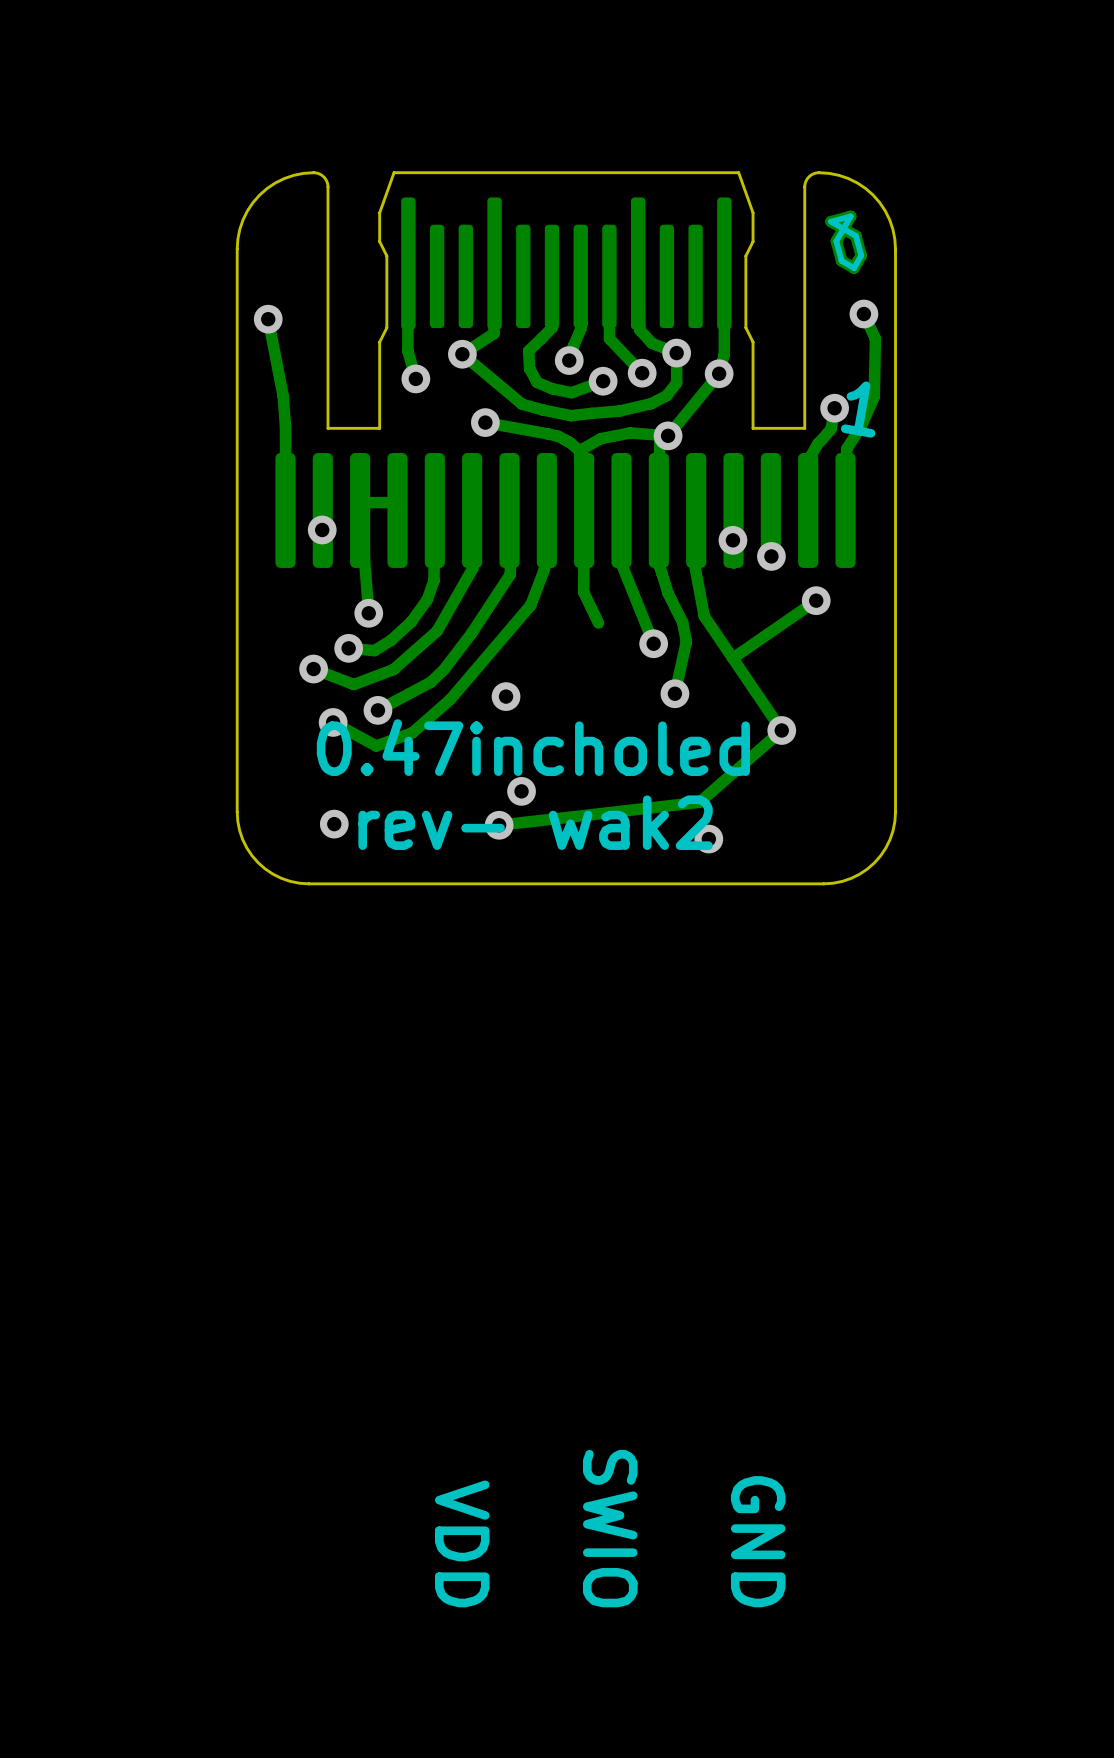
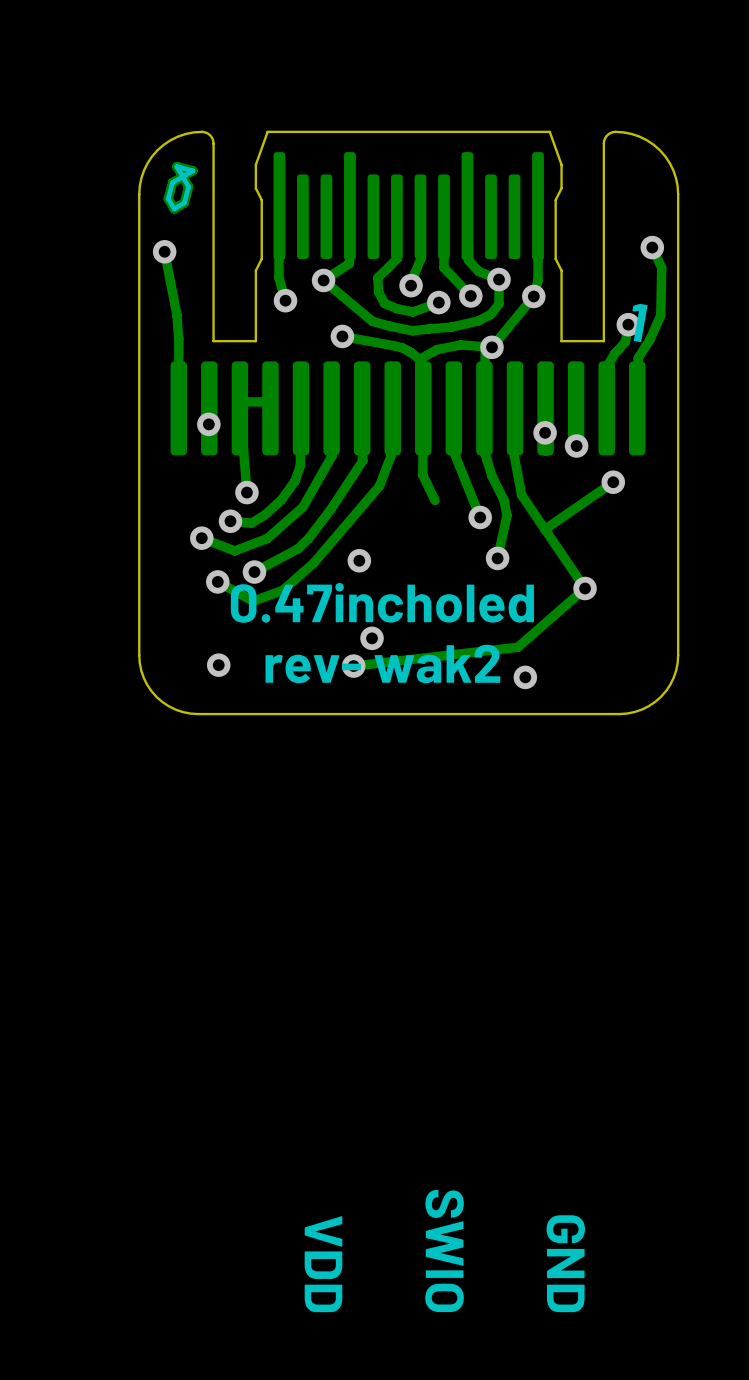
line: none -> (176, 166) (188, 186) (184, 202) (174, 208) (168, 198) (172, 182) (192, 170) (176, 166)
track: none -> (176, 166) (188, 186) (184, 202) (174, 208) (168, 198) (172, 182) (192, 170) (176, 166)
line: (850, 216) (836, 241) (841, 260) (854, 268) (861, 255) (855, 235) (831, 221) (850, 216) -> none
track: (850, 216) (831, 221) (855, 235) (861, 255) (854, 268) (841, 260) (836, 241) (850, 216) -> none

